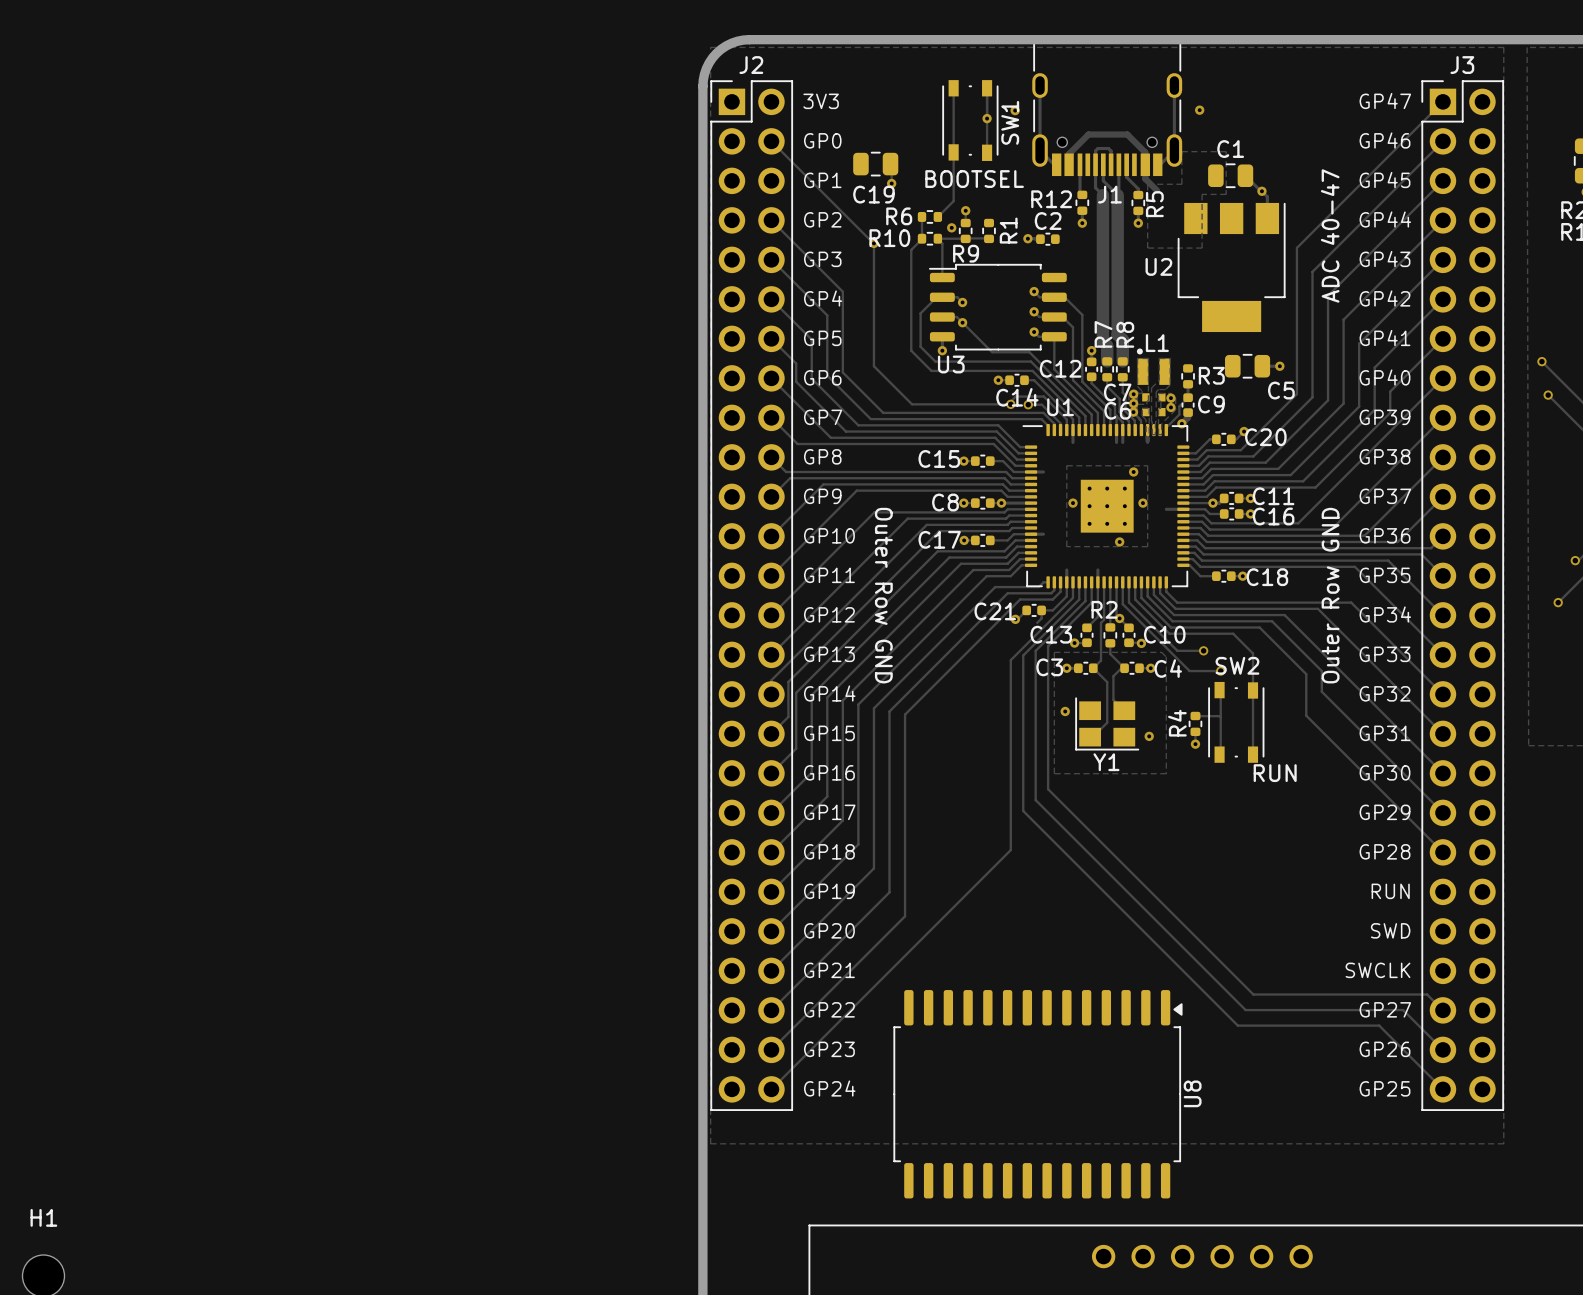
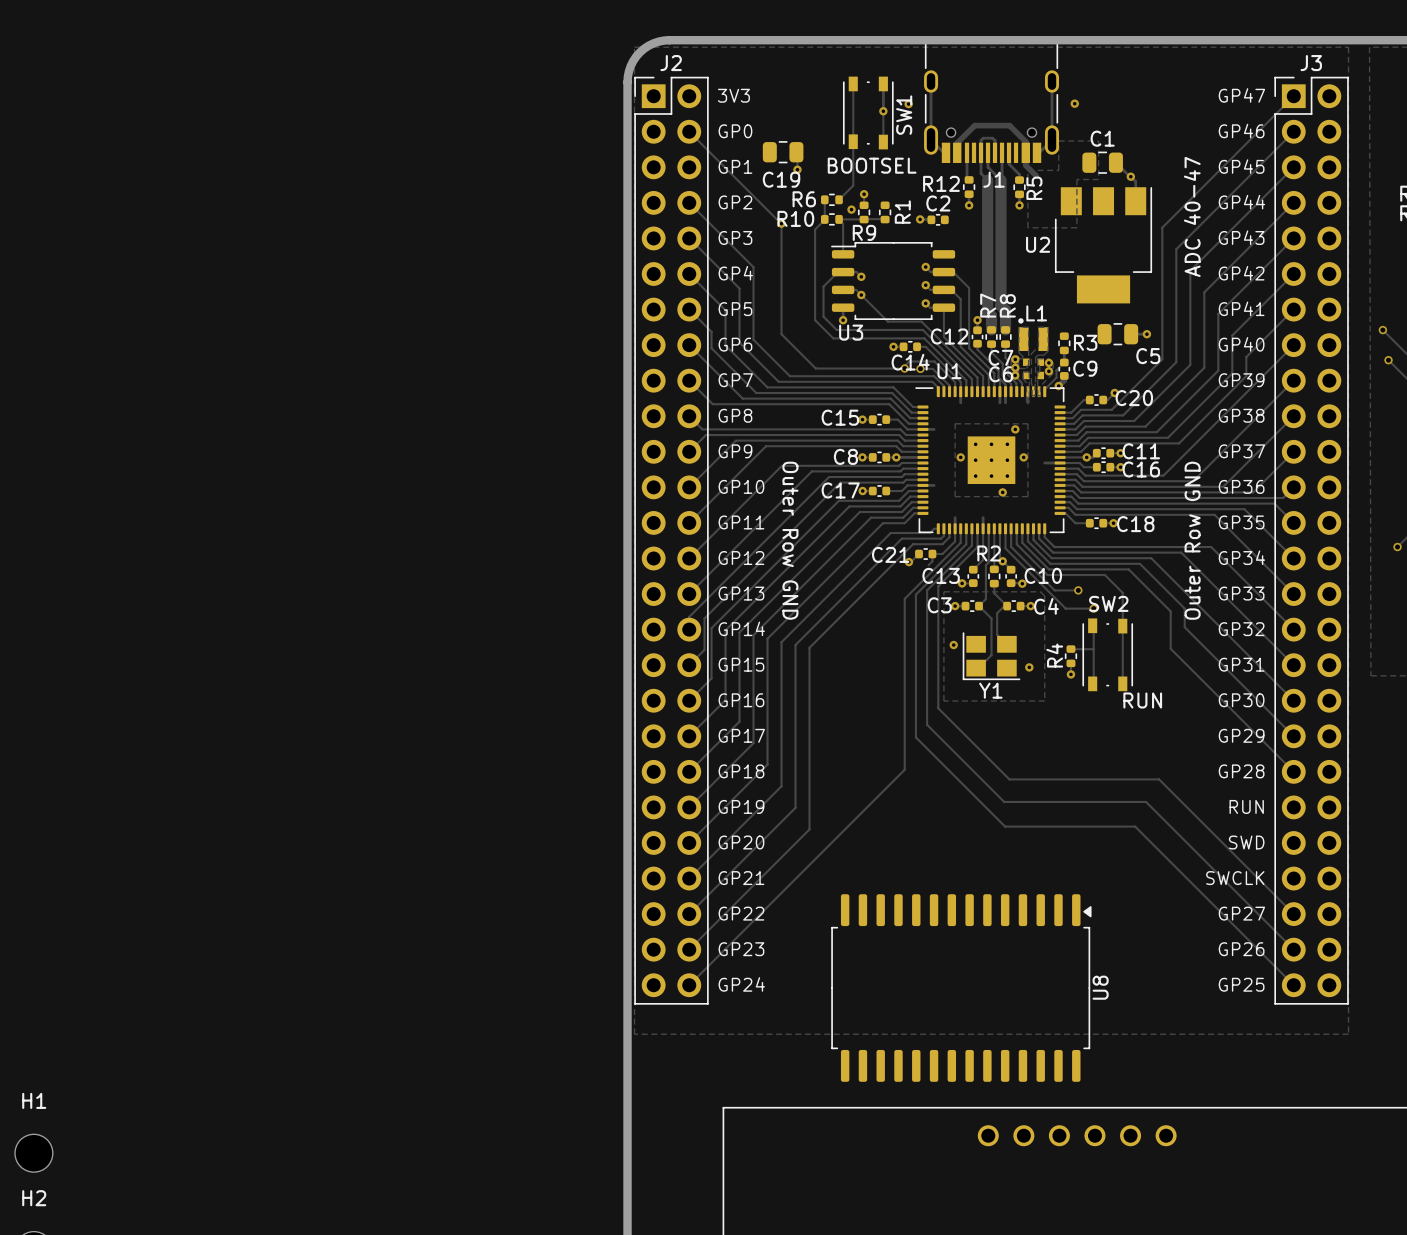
track: (1048, 781) (1048, 789) (1253, 994) (1427, 994) -> (938, 708) (1009, 779) (1159, 779) (1279, 899)
track: (1023, 811) (1237, 1025) (1379, 1025) -> (915, 734) (915, 737) (1005, 826) (1135, 826) (1236, 927)
track: (1121, 885) (1245, 1010) (1403, 1010) -> (1004, 801) (1146, 801) (1257, 913)
U8 position: (1037, 1094) -> (961, 988)

